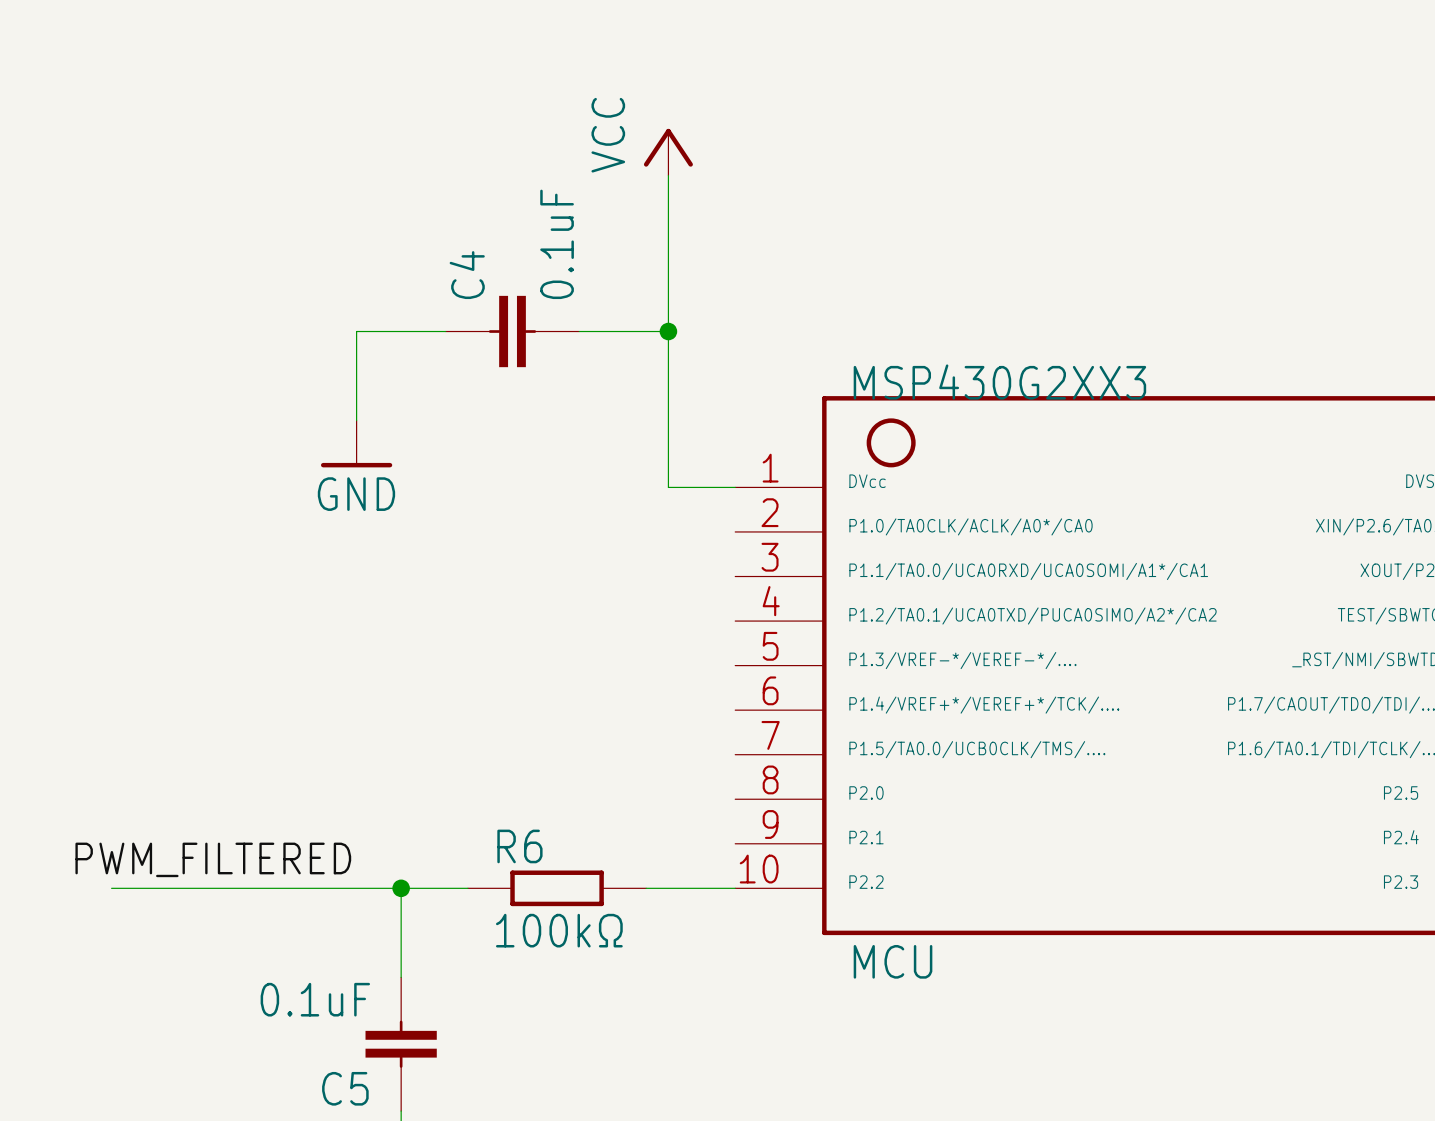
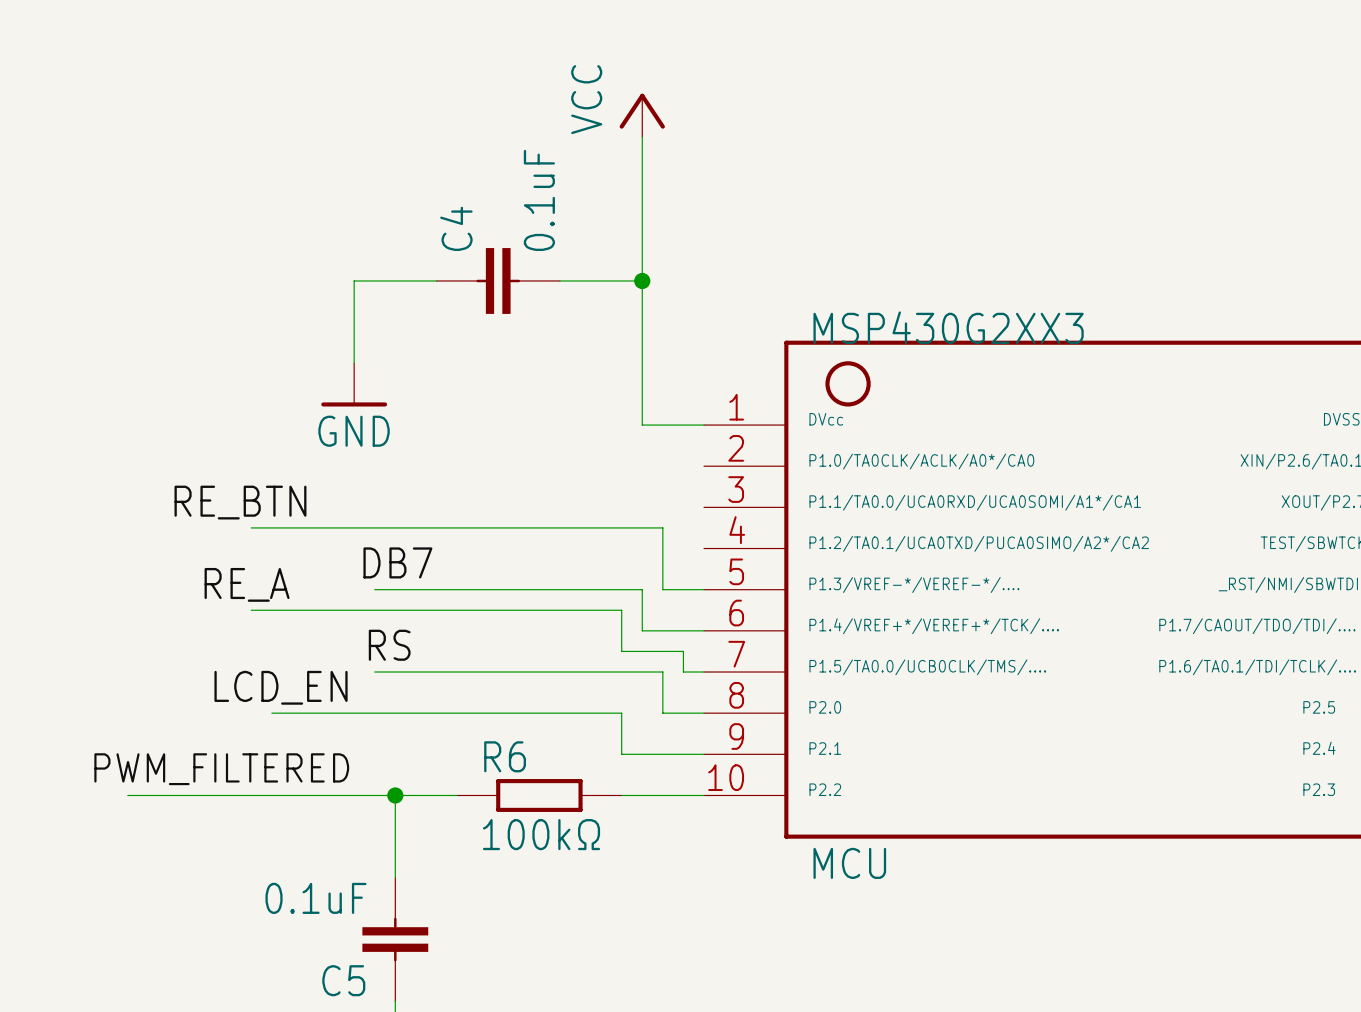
label: none -> RE_BTN (240, 502)
wire: none -> (251, 527) (662, 527) (662, 589) (704, 589)
label: none -> DB7 (397, 562)
label: none -> RE_A (247, 584)
wire: none -> (374, 589) (642, 589) (642, 630) (704, 630)
wire: none -> (251, 610) (621, 610) (621, 651) (683, 651) (683, 672) (704, 672)
label: none -> RS (389, 645)
wire: none -> (374, 672) (662, 672) (662, 713) (704, 713)
label: none -> LCD_EN (281, 687)
wire: none -> (271, 713) (621, 713) (621, 754) (704, 754)

